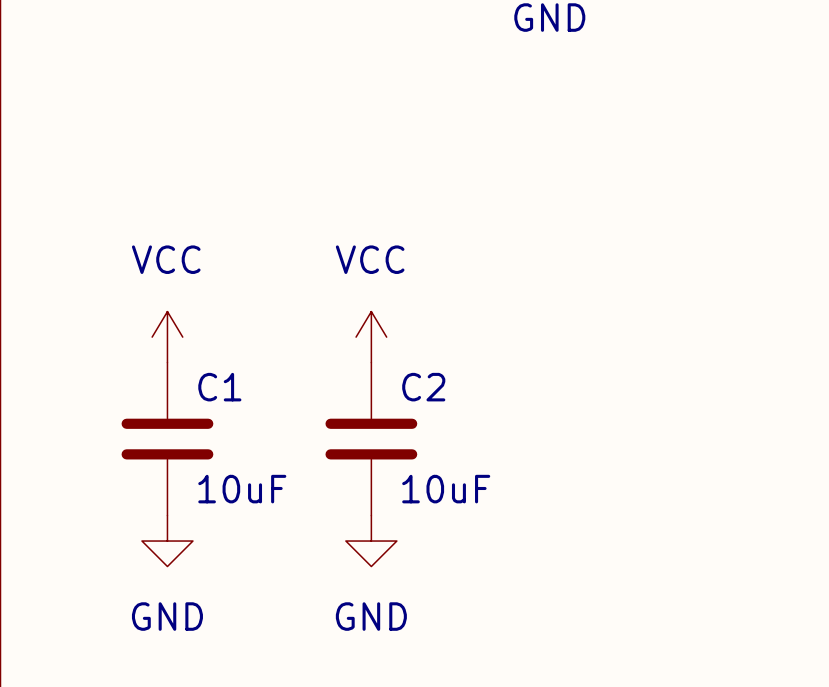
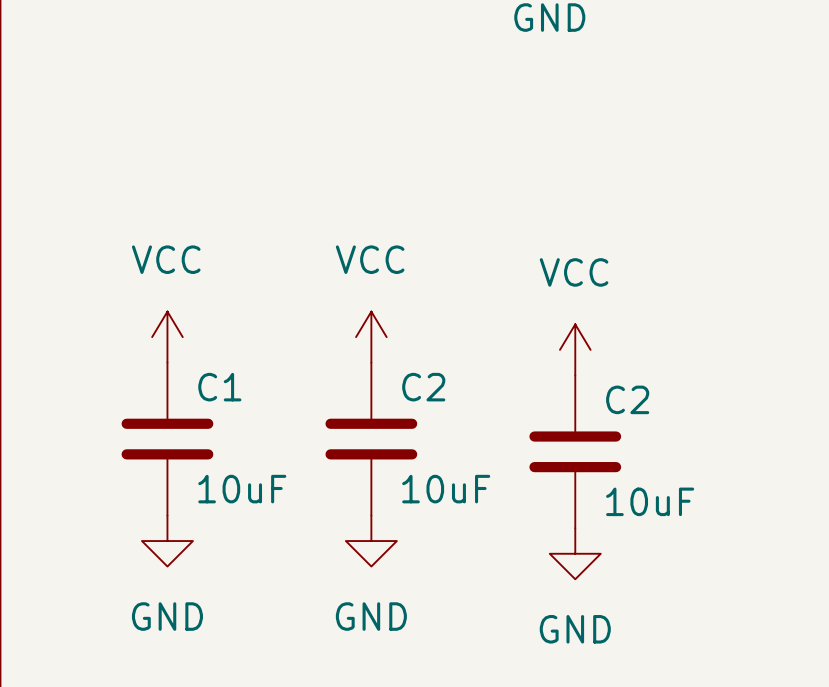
power symbol: none -> VCC (575, 349)
C2: none -> 10uF (575, 451)
power symbol: none -> GND (575, 553)

